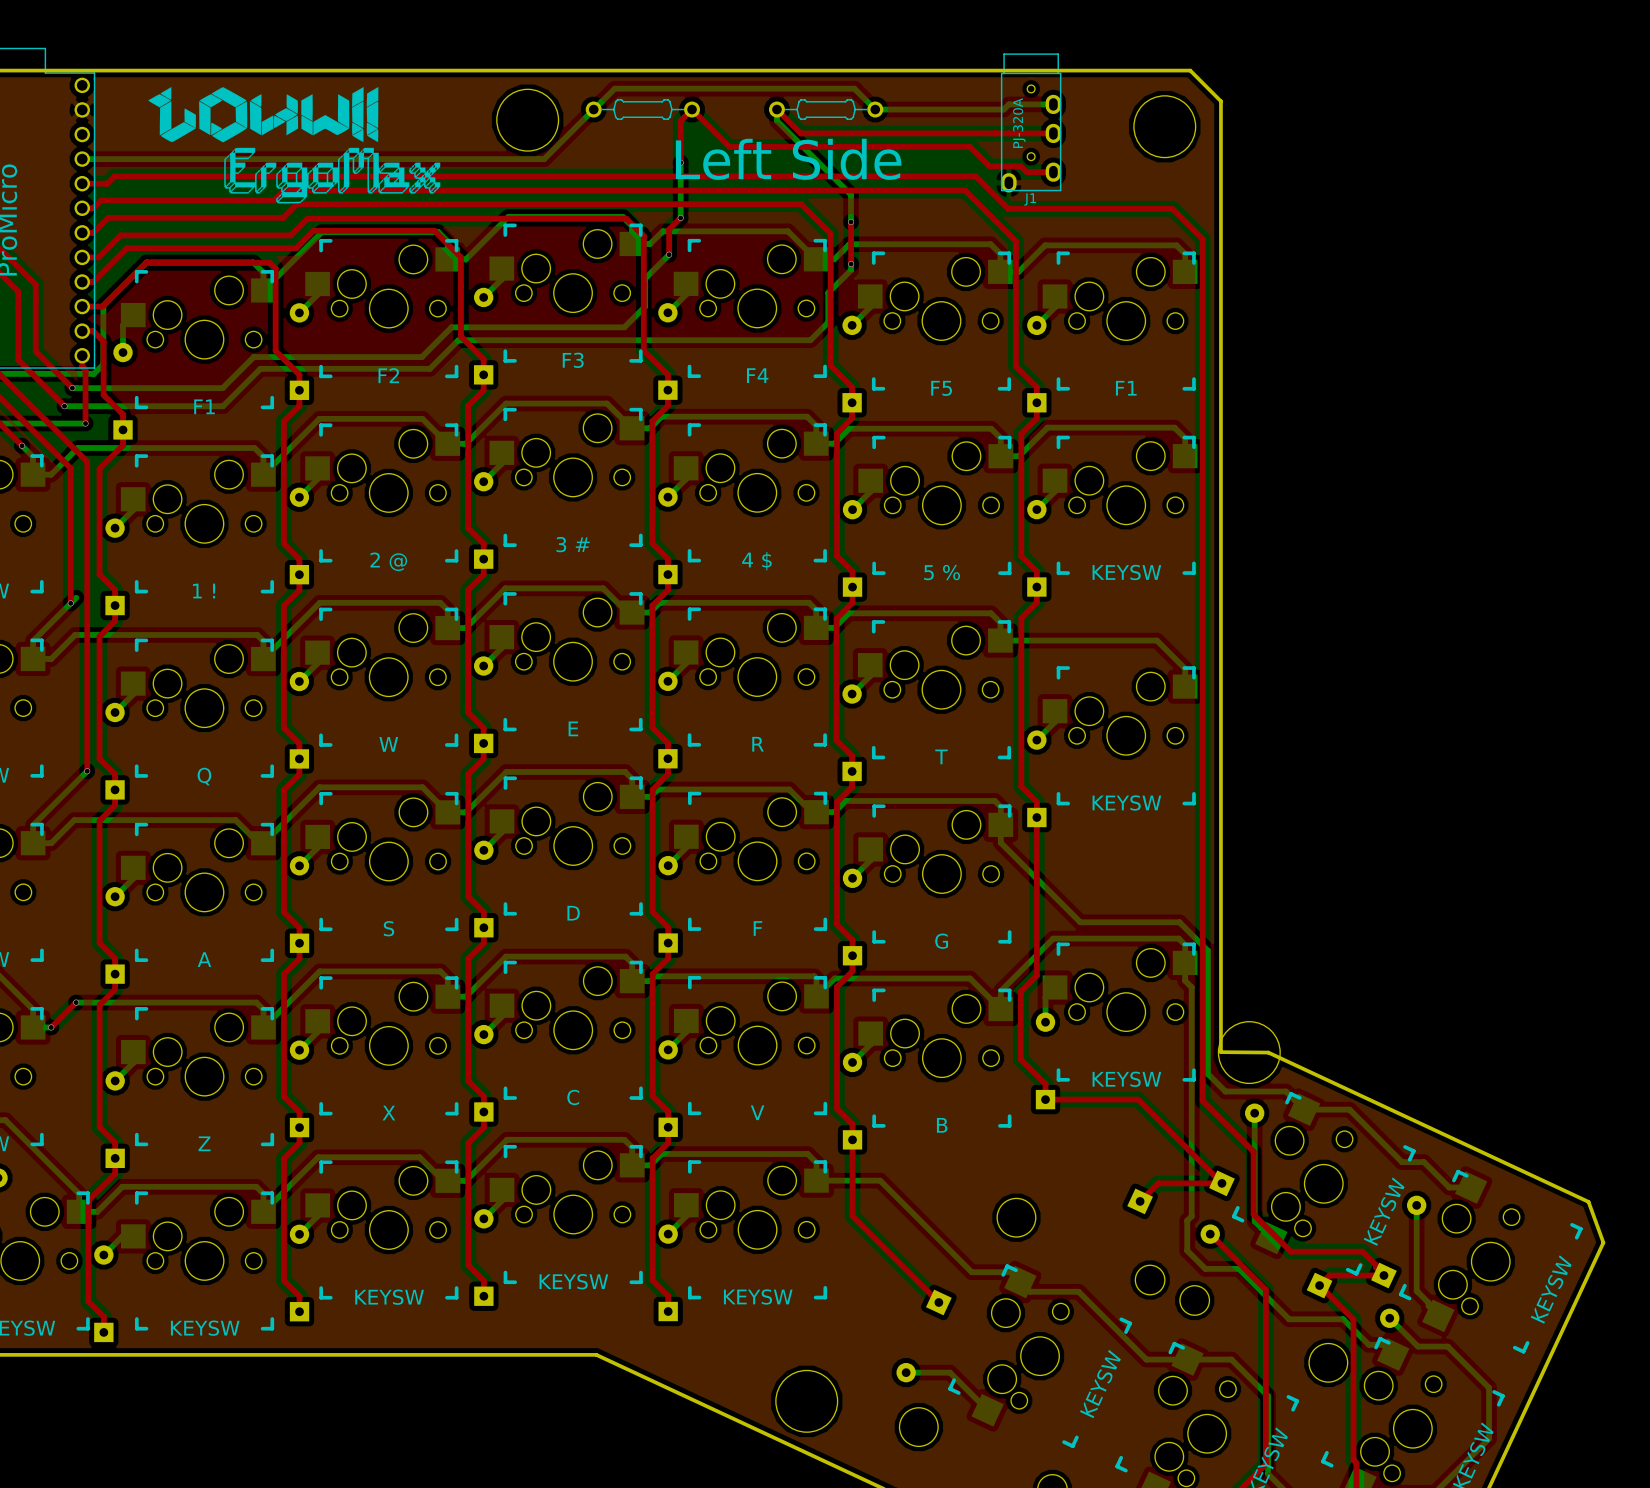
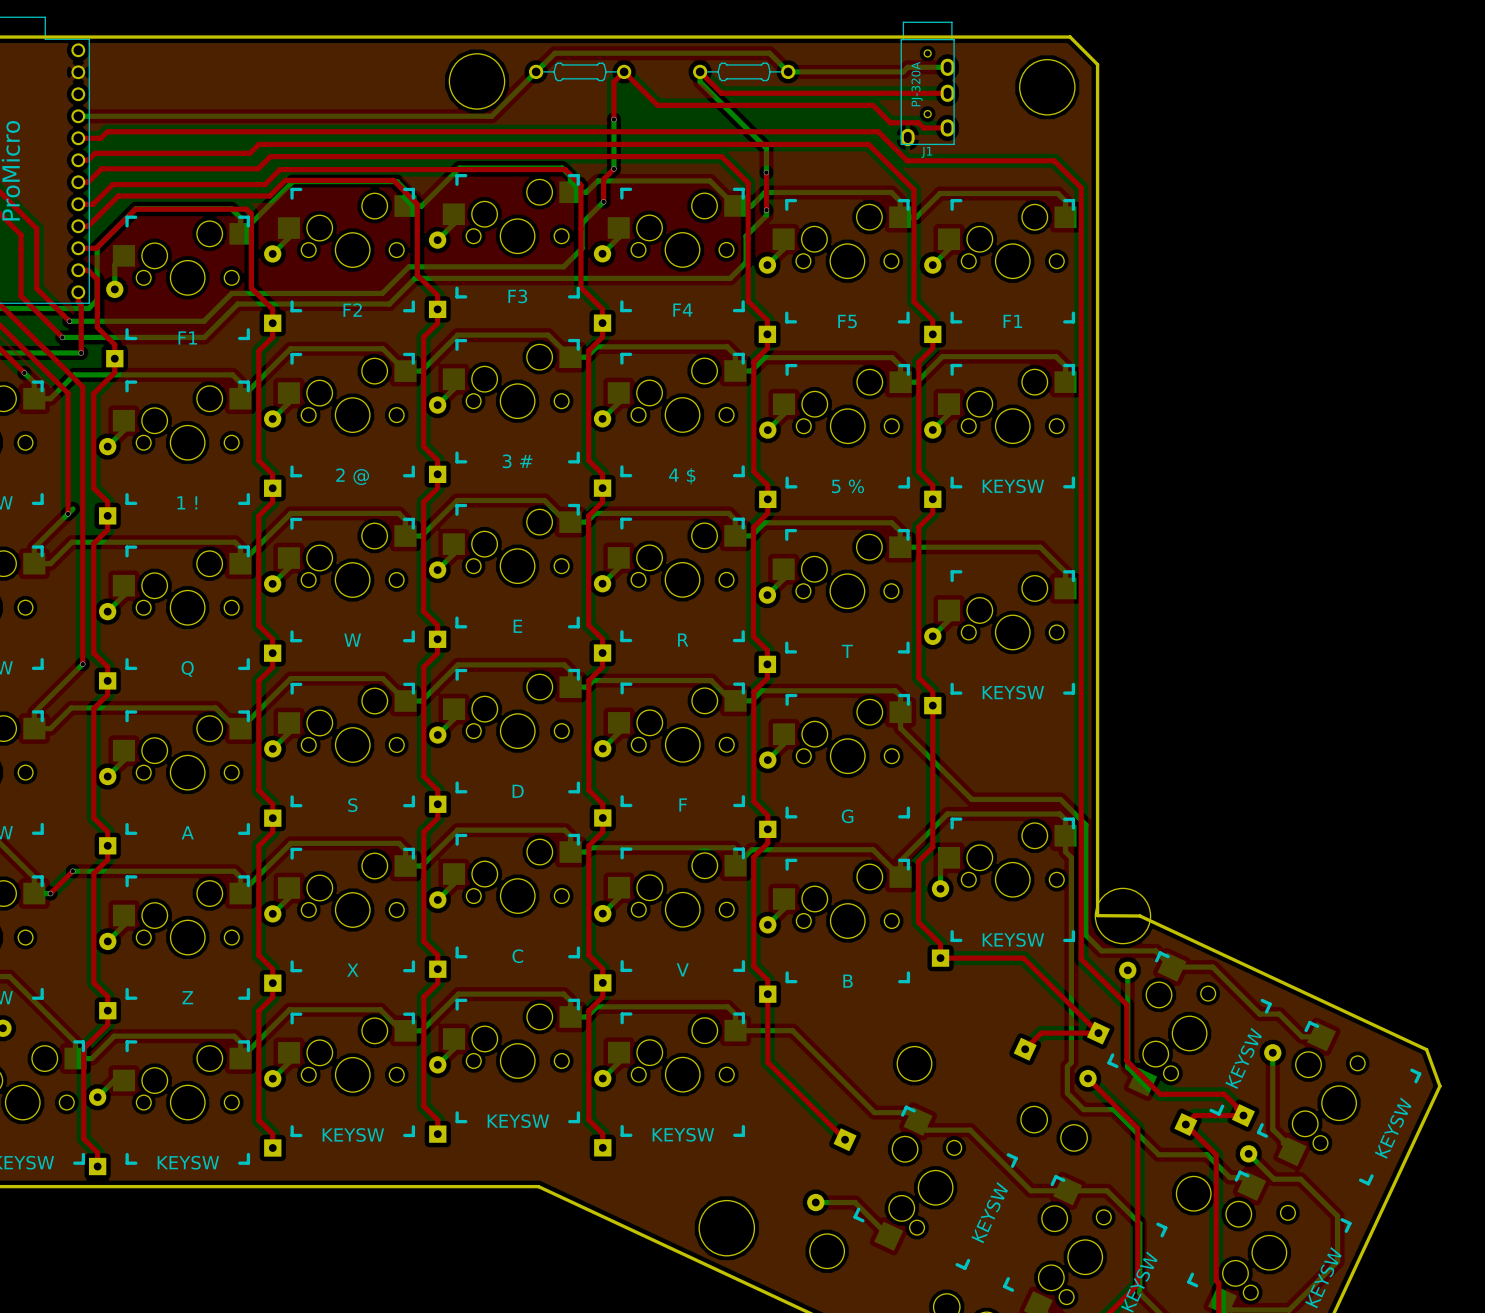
drawing: [148, 86, 441, 204] -> none
drawing: [675, 138, 902, 180] -> none

